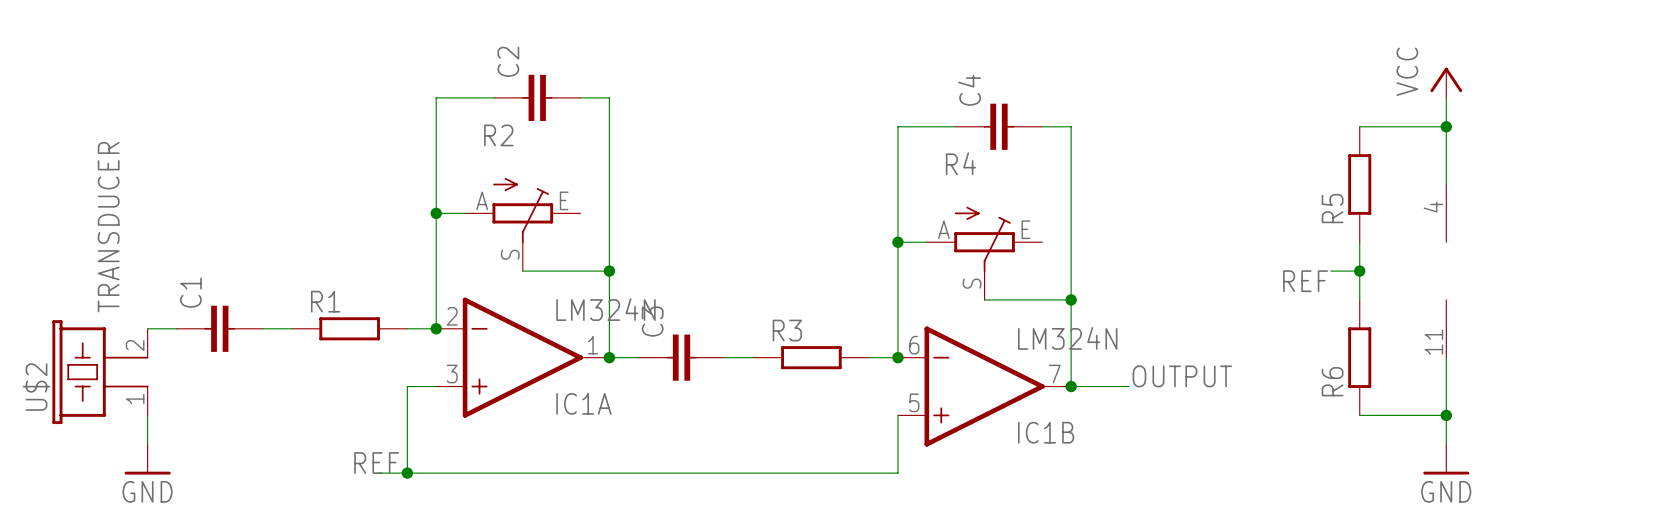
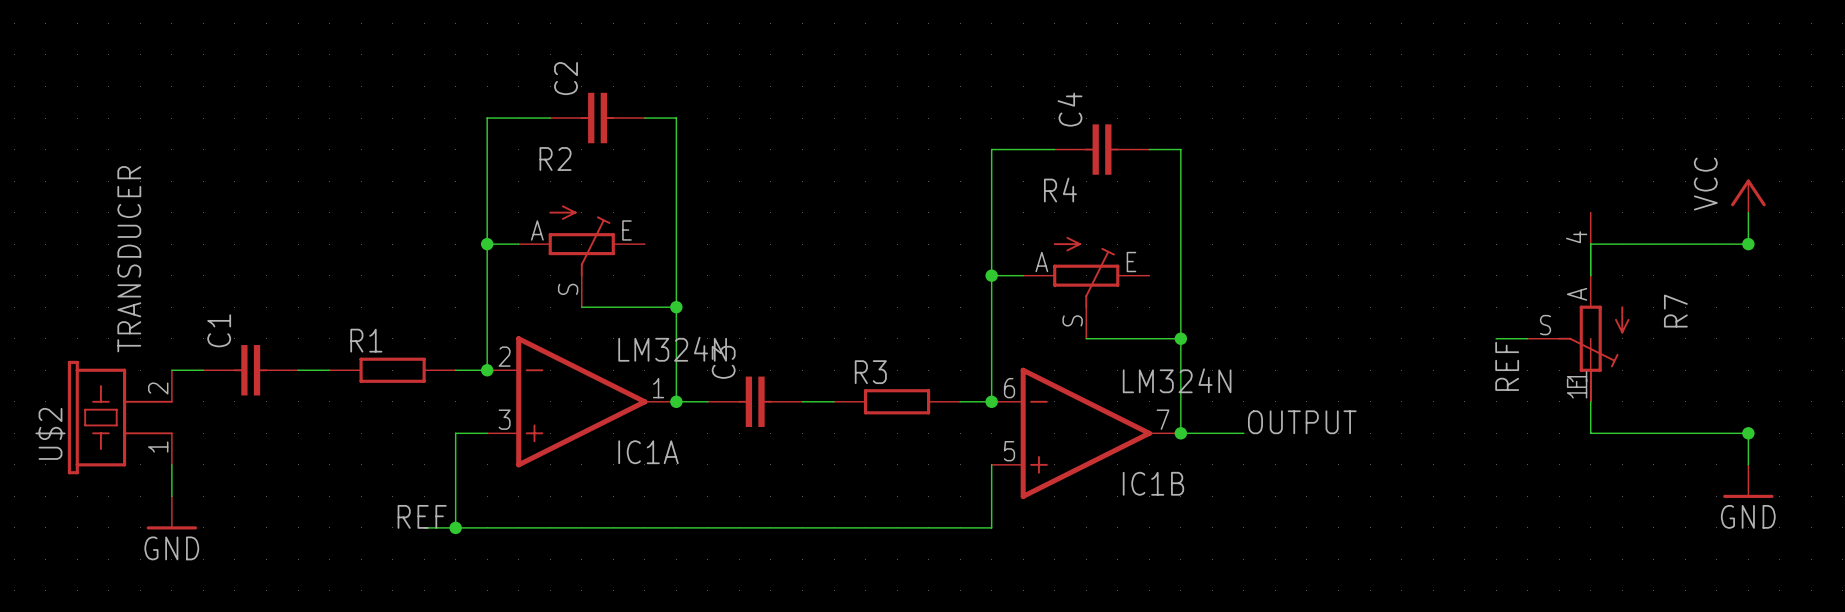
power symbol position: VCC (1446, 82) -> VCC (1748, 196)
wire: (1446, 97) (1446, 184) -> none
wire: (1359, 126) (1446, 126) -> none
junction: (1446, 126) -> none
R5: (1359, 184) -> none
wire: none -> (1748, 212) (1748, 244) (1590, 244) (1590, 275)
junction: none -> (1748, 244)
wire: (1359, 242) (1359, 299) -> (1527, 338) (1496, 338)
wire: (1330, 271) (1359, 271) -> none
junction: (1359, 271) -> none
label rotation: 0° (1305, 281) -> 90° counterclockwise (1507, 366)
label position: REF (1305, 281) -> REF (1507, 366)
R7: none -> (1578, 338)
R6: (1359, 357) -> none
wire: (1446, 386) (1446, 444) -> (1590, 433) (1748, 433) (1748, 464)
junction: none -> (1748, 433)
wire: (1359, 415) (1446, 415) -> none
junction: (1446, 415) -> none
power symbol position: GND (1446, 459) -> GND (1748, 481)

